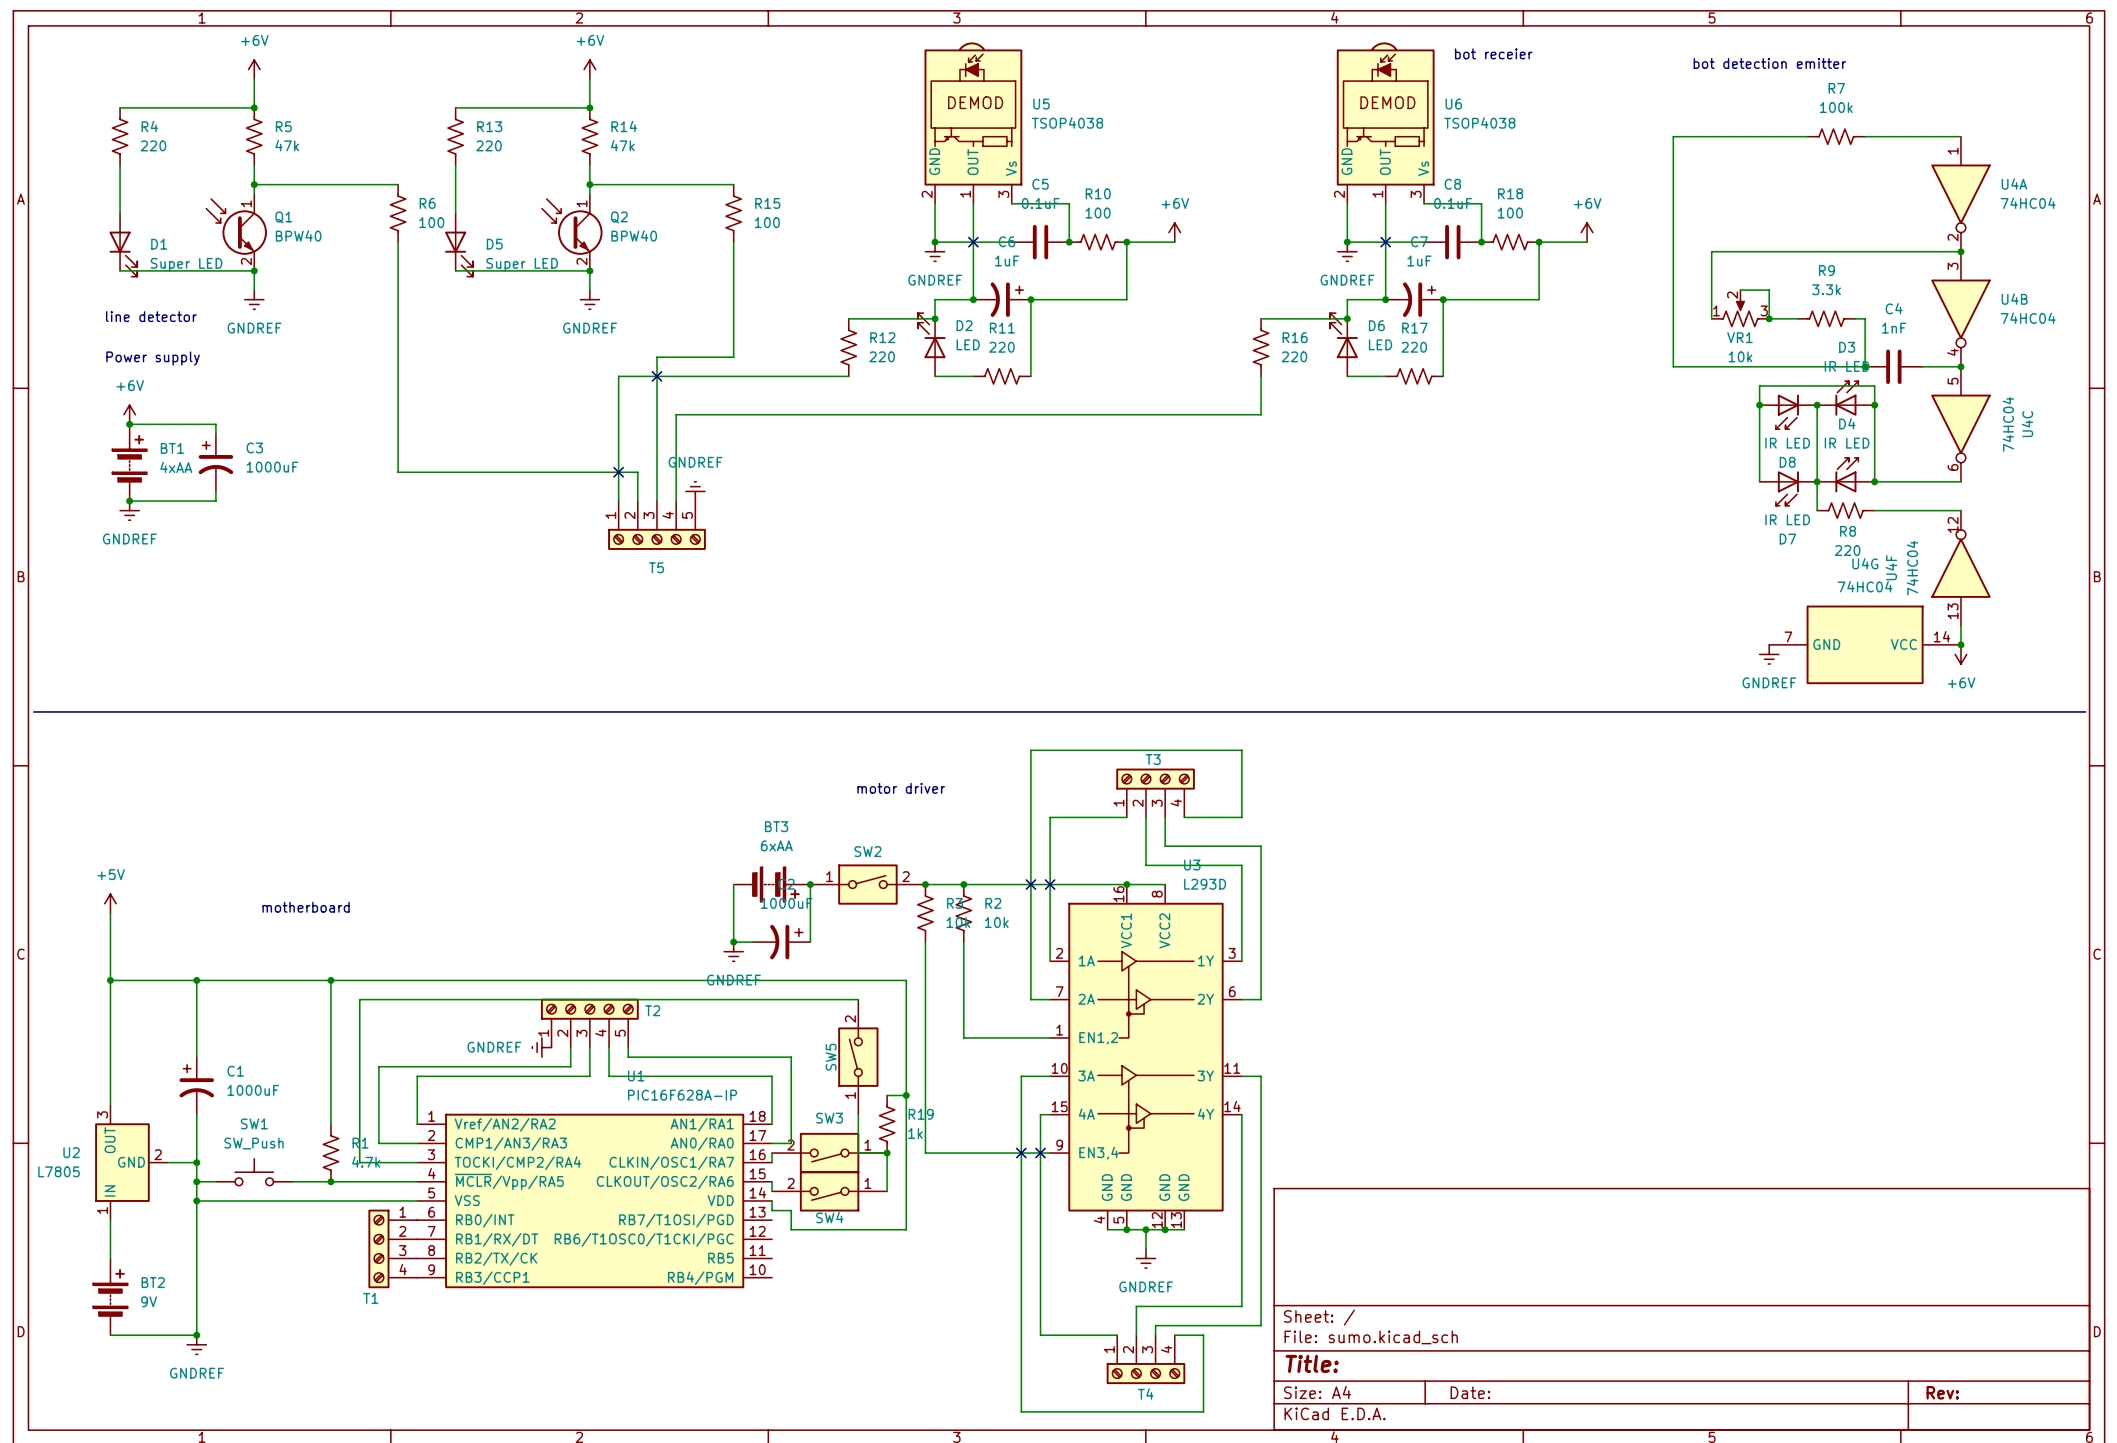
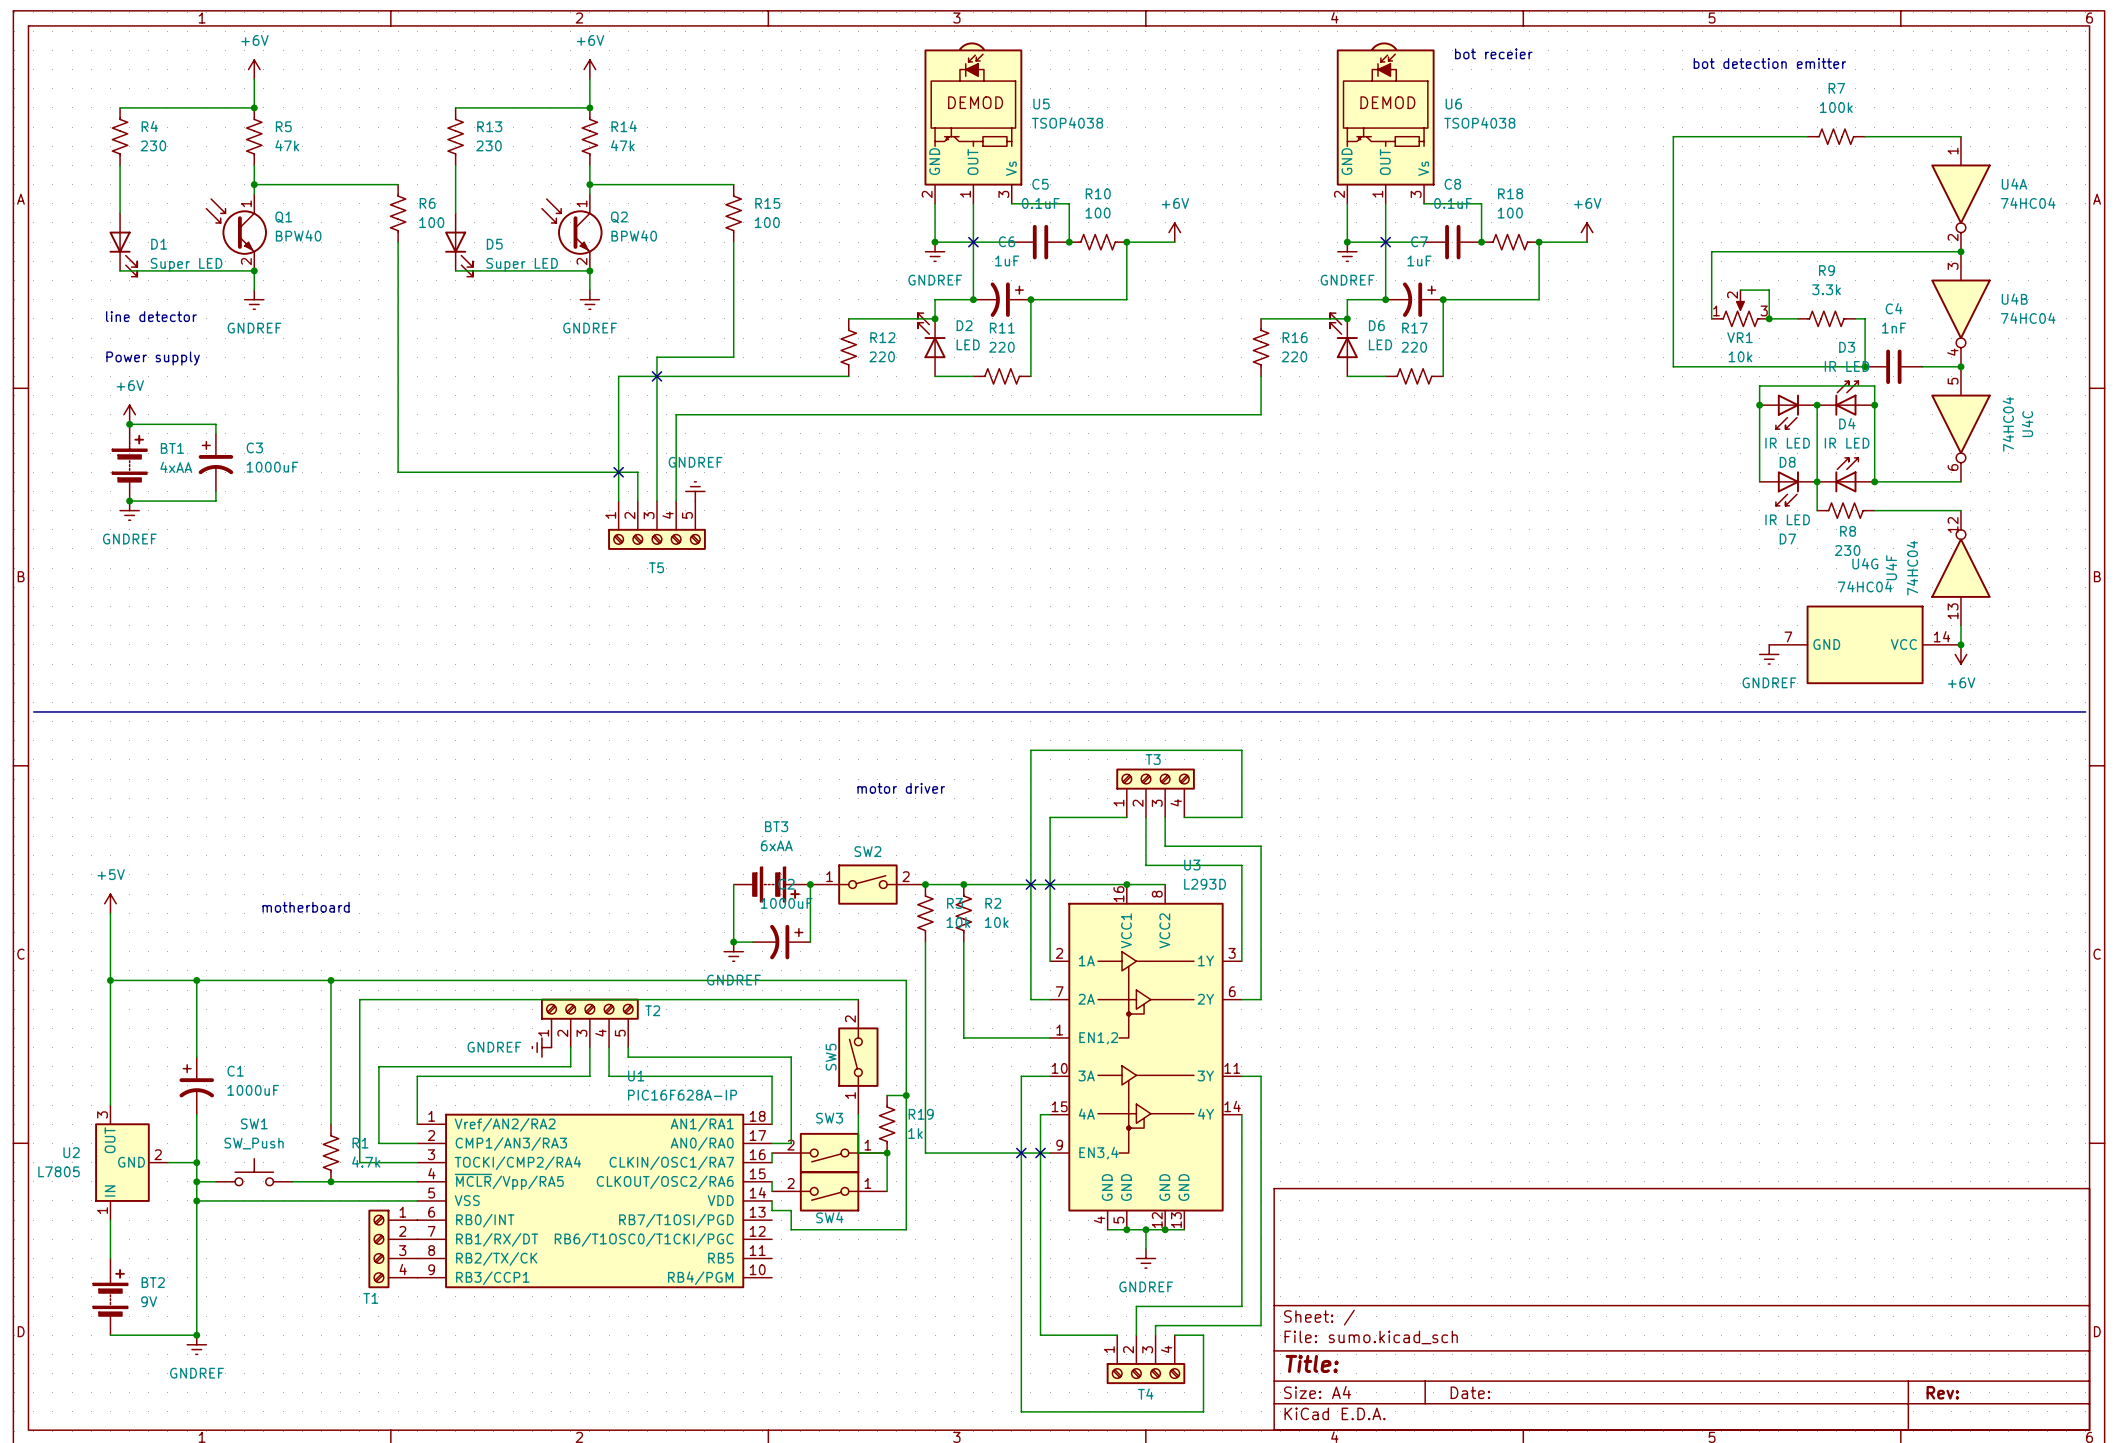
R4 value: 220 (153, 145) -> 230 (153, 145)
R13 value: 220 (489, 145) -> 230 (489, 145)
R8 value: 220 (1847, 550) -> 230 (1847, 550)

